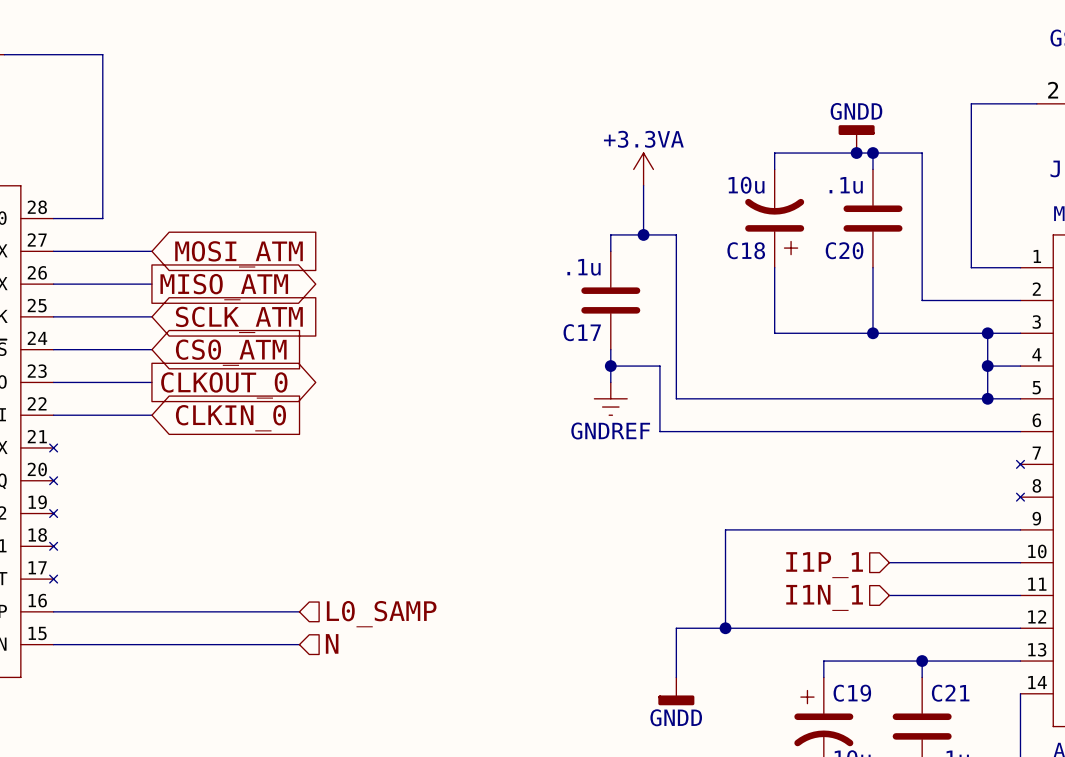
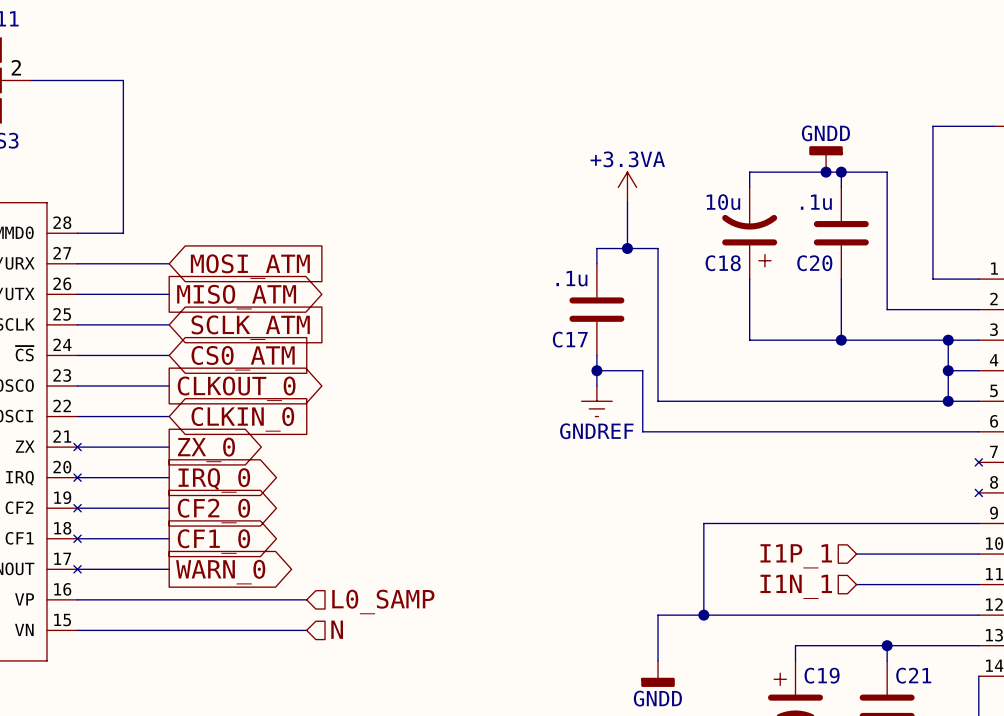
wire: none -> (77, 447) (169, 447)
global label: none -> ZX_0 (206, 449)
wire: none -> (77, 477) (169, 477)
global label: none -> IRQ_0 (214, 480)
wire: none -> (77, 508) (169, 508)
global label: none -> CF2_0 (213, 511)
wire: none -> (77, 538) (169, 538)
global label: none -> CF1_0 (213, 541)
wire: none -> (77, 569) (169, 569)
global label: none -> WARN_0 (220, 572)

